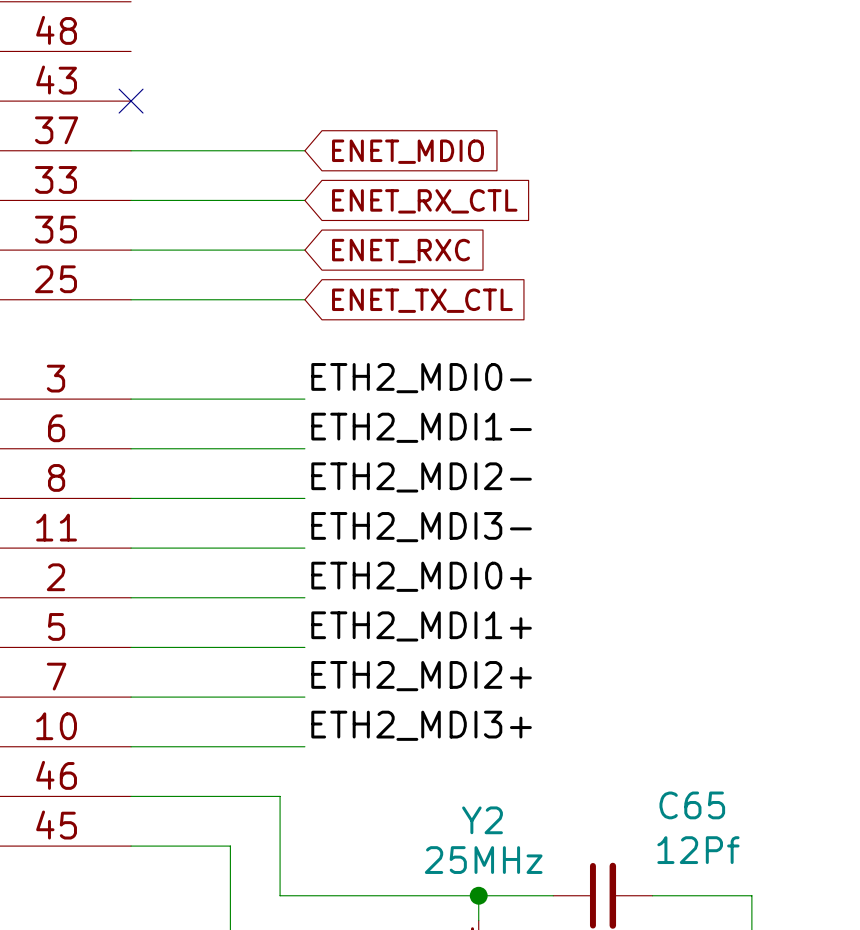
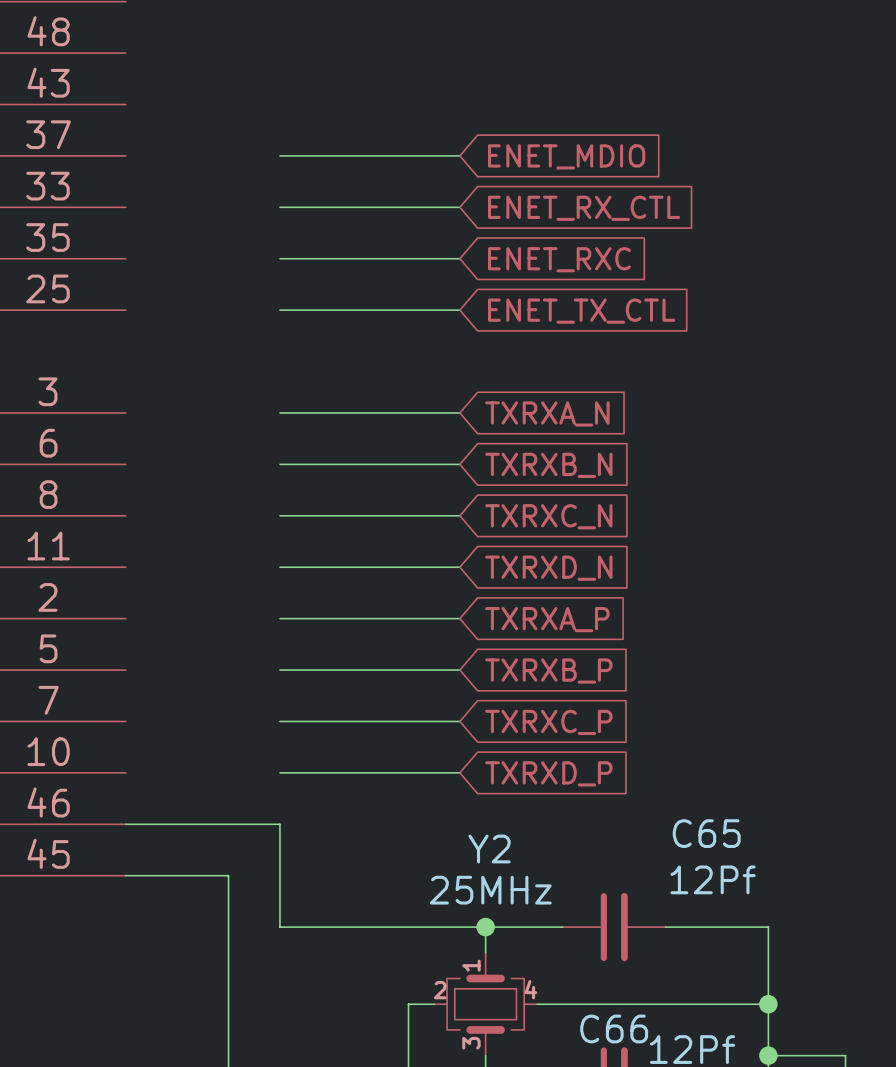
no-connect mark: (131, 101) -> none
wire: (131, 150) (280, 150) -> (305, 155) (459, 155)
global label position: ENET_MDIO (408, 151) -> ENET_MDIO (566, 156)
wire: (131, 200) (280, 200) -> (305, 207) (459, 207)
global label position: ENET_RX_CTL (424, 201) -> ENET_RX_CTL (583, 208)
wire: (131, 250) (280, 250) -> (305, 258) (459, 258)
global label position: ENET_RXC (401, 251) -> ENET_RXC (559, 259)
wire: (131, 299) (280, 299) -> (305, 310) (459, 310)
global label position: ENET_TX_CTL (422, 300) -> ENET_TX_CTL (581, 311)
label: ETH2_MDI0- (421, 378) -> none
wire: (131, 399) (280, 399) -> (305, 412) (459, 412)
global label: none -> TXRXA_N (547, 413)
label: ETH2_MDI1- (421, 427) -> none
wire: (131, 448) (280, 448) -> (305, 464) (459, 464)
global label: none -> TXRXB_N (548, 465)
label: ETH2_MDI2- (421, 477) -> none
wire: (131, 498) (280, 498) -> (305, 515) (459, 515)
global label: none -> TXRXC_N (548, 516)
label: ETH2_MDI3- (421, 527) -> none
wire: (131, 548) (280, 548) -> (305, 567) (459, 567)
global label: none -> TXRXD_N (548, 568)
label: ETH2_MDI0+ (421, 576) -> none
wire: (131, 597) (280, 597) -> (305, 618) (459, 618)
global label: none -> TXRXA_P (547, 619)
label: ETH2_MDI1+ (421, 626) -> none
wire: (131, 647) (280, 647) -> (305, 670) (459, 670)
global label: none -> TXRXB_P (548, 671)
label: ETH2_MDI2+ (421, 676) -> none
wire: (131, 697) (280, 697) -> (305, 721) (459, 721)
global label: none -> TXRXC_P (548, 722)
label: ETH2_MDI3+ (421, 725) -> none
wire: (131, 746) (280, 746) -> (305, 772) (459, 772)
global label: none -> TXRXD_P (548, 773)

